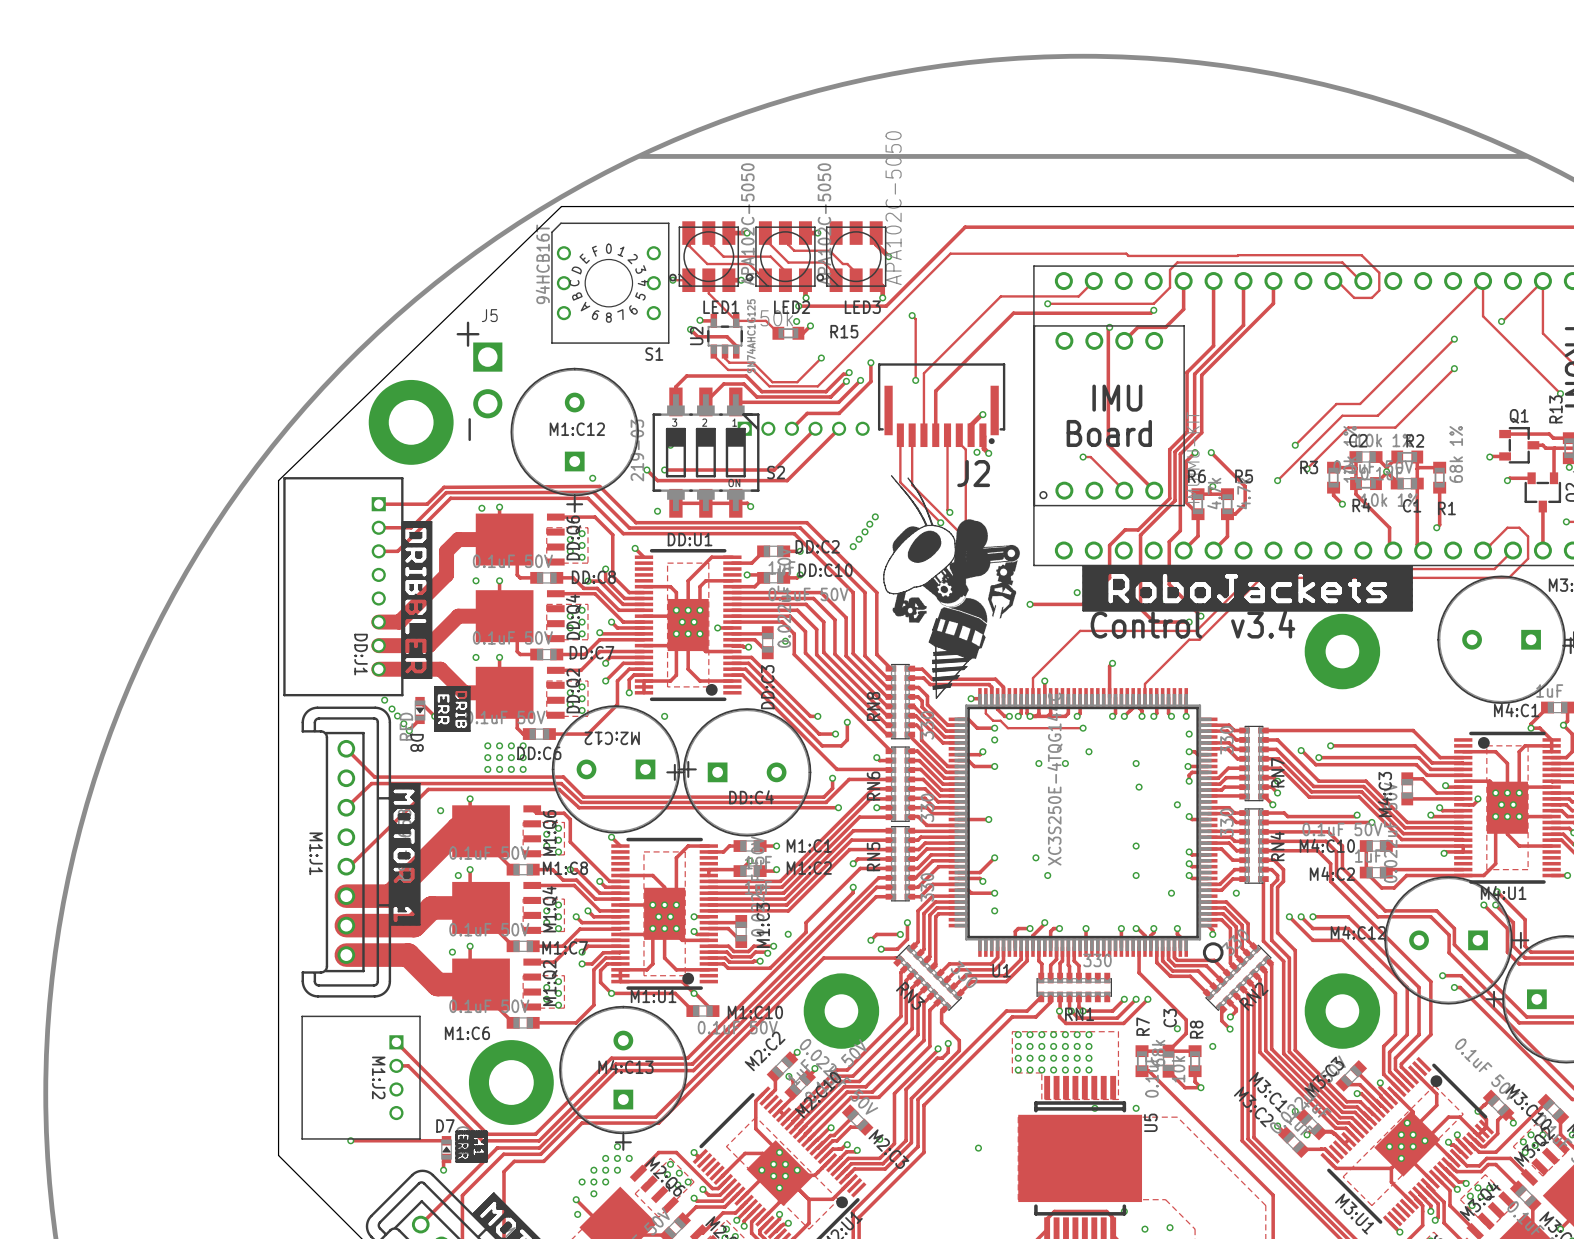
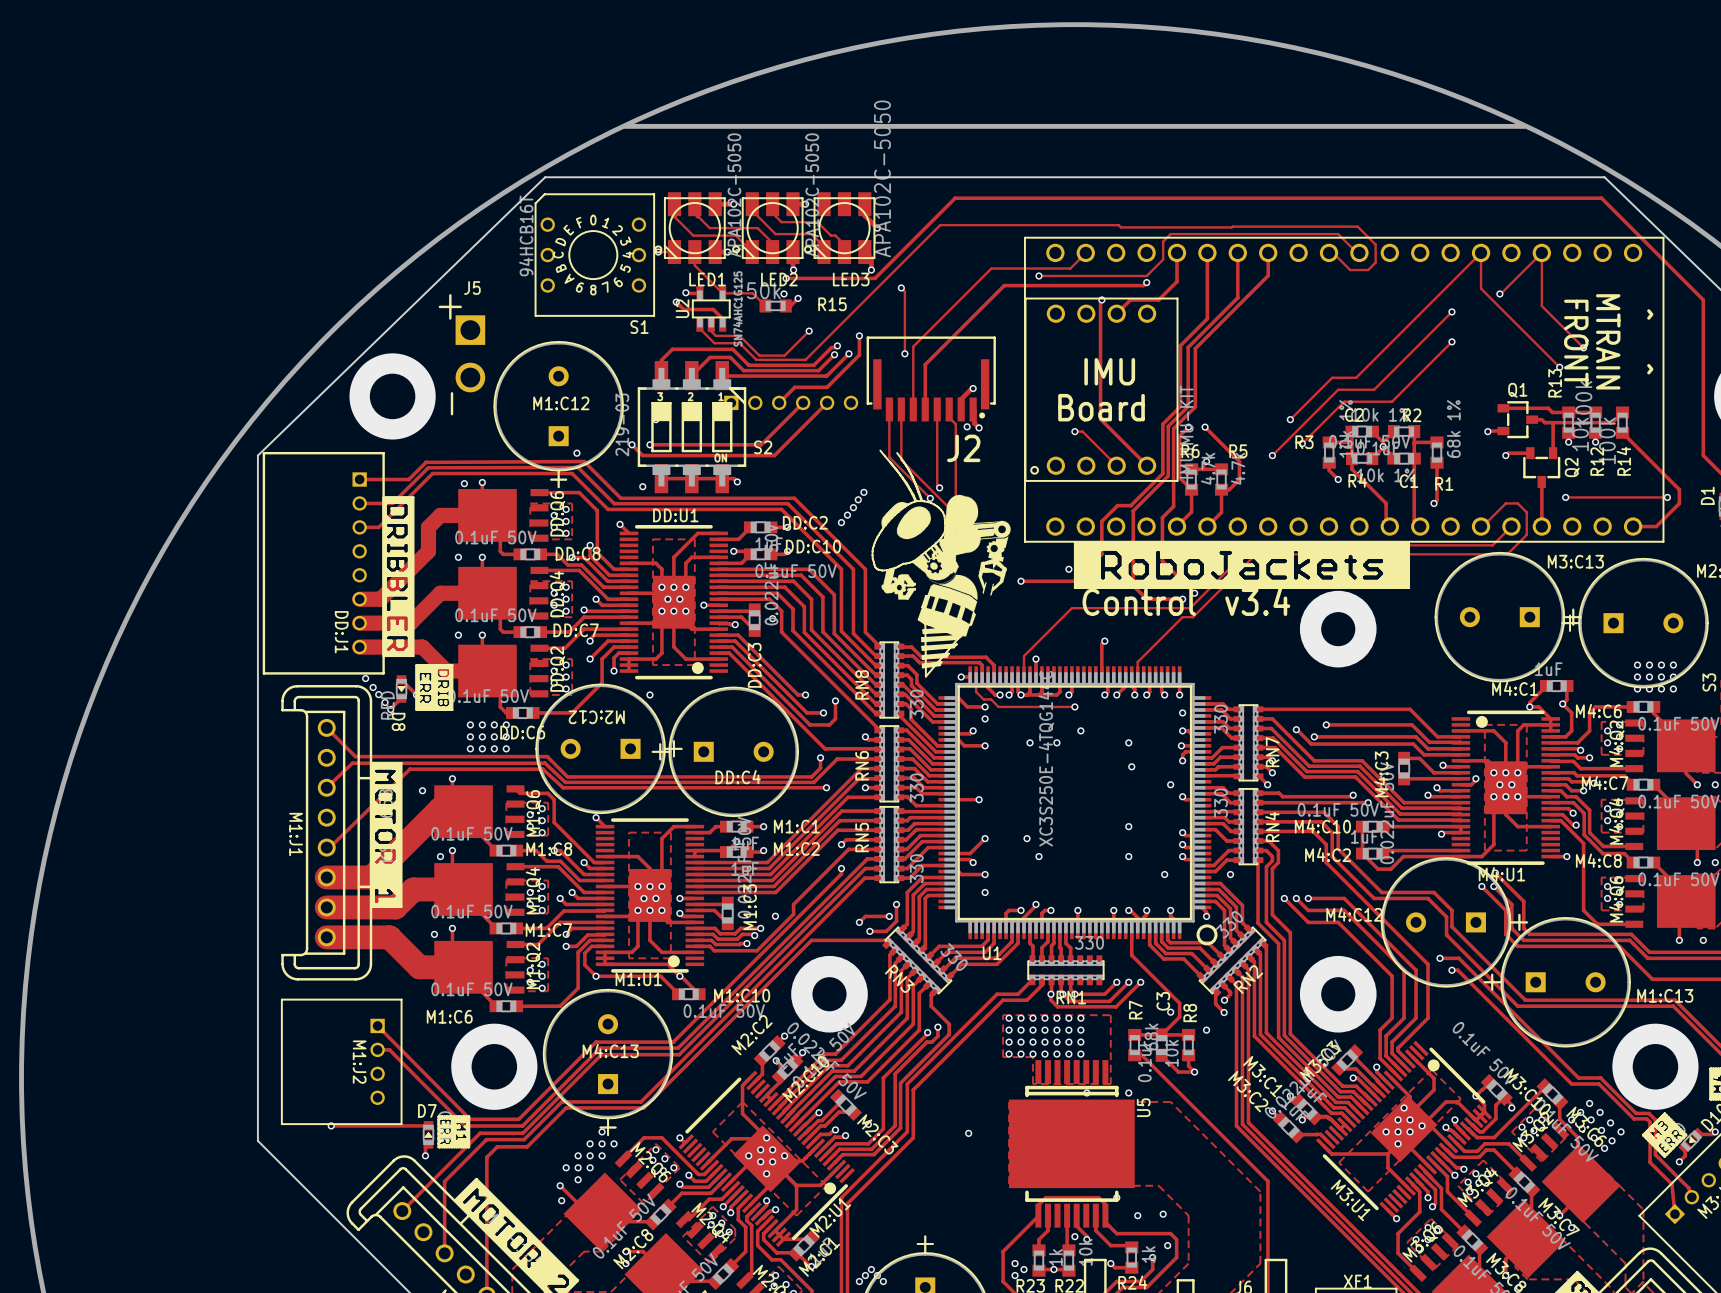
U2 footprint: [707, 313, 743, 359] -> [691, 286, 731, 332]

